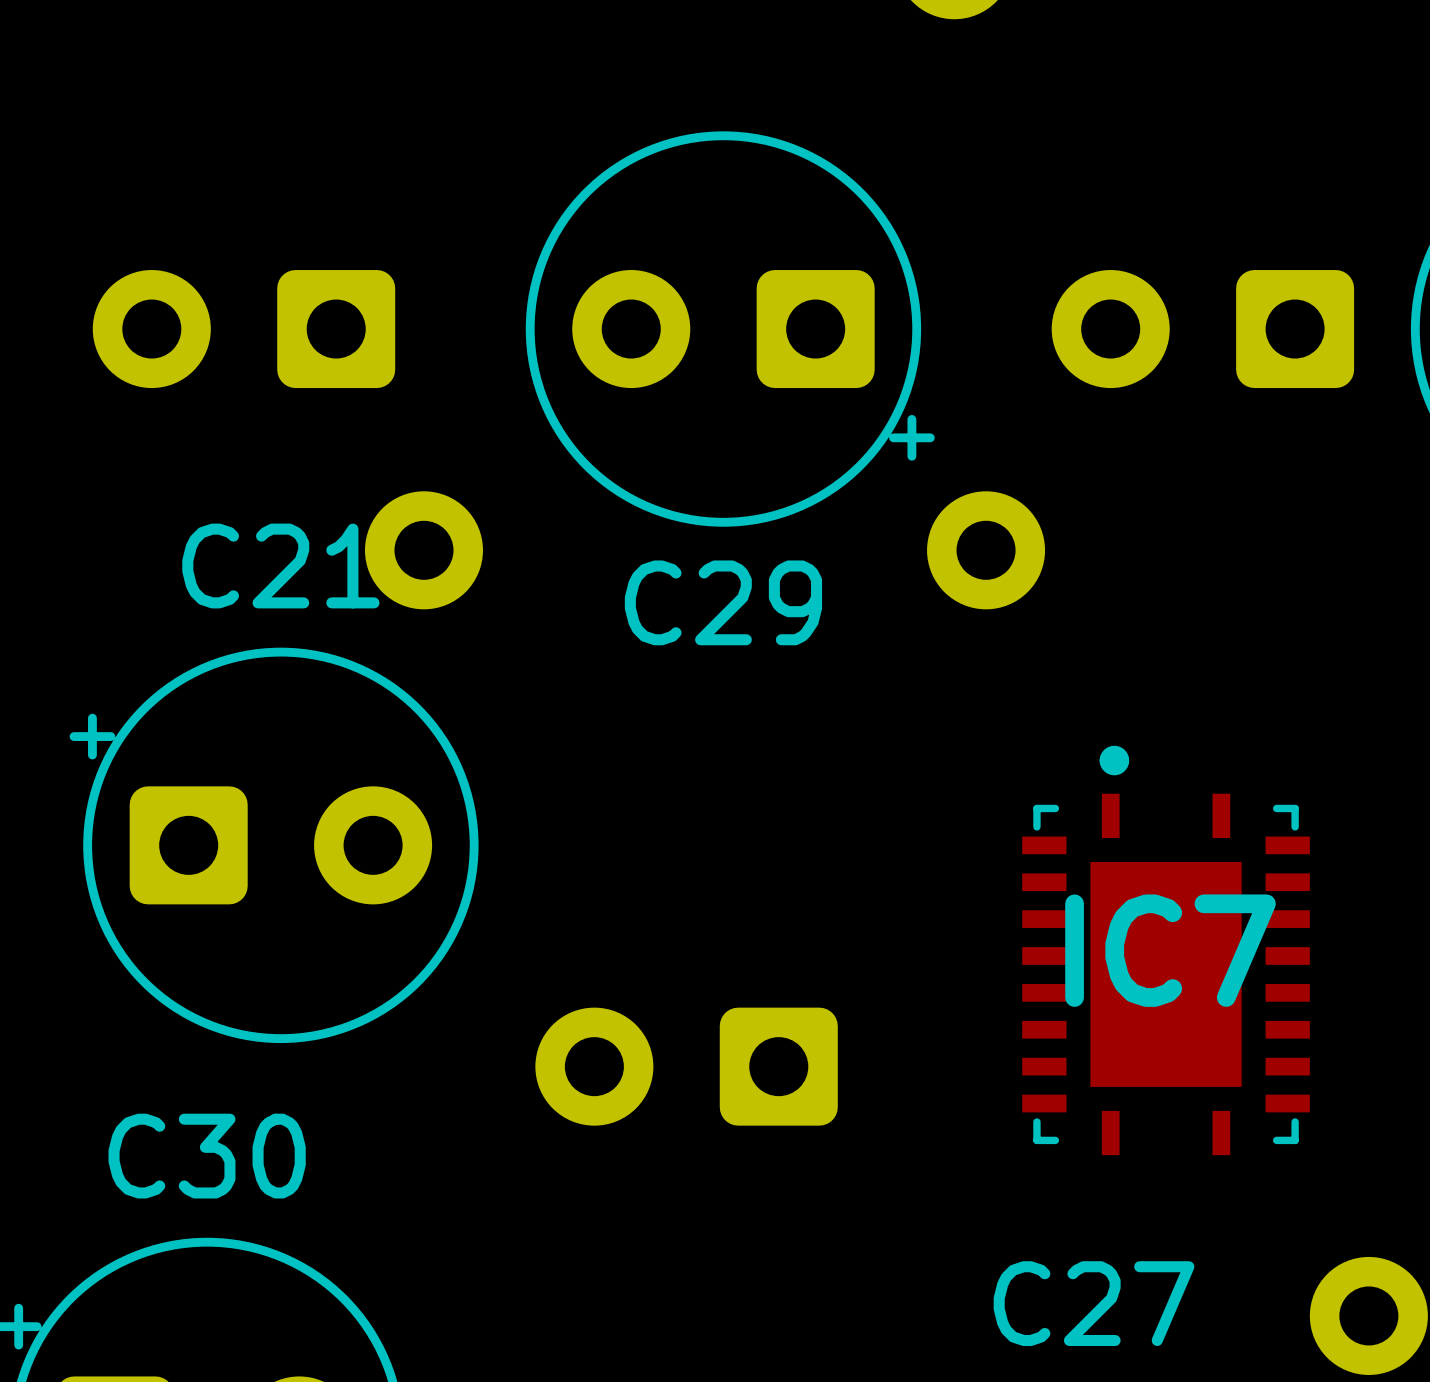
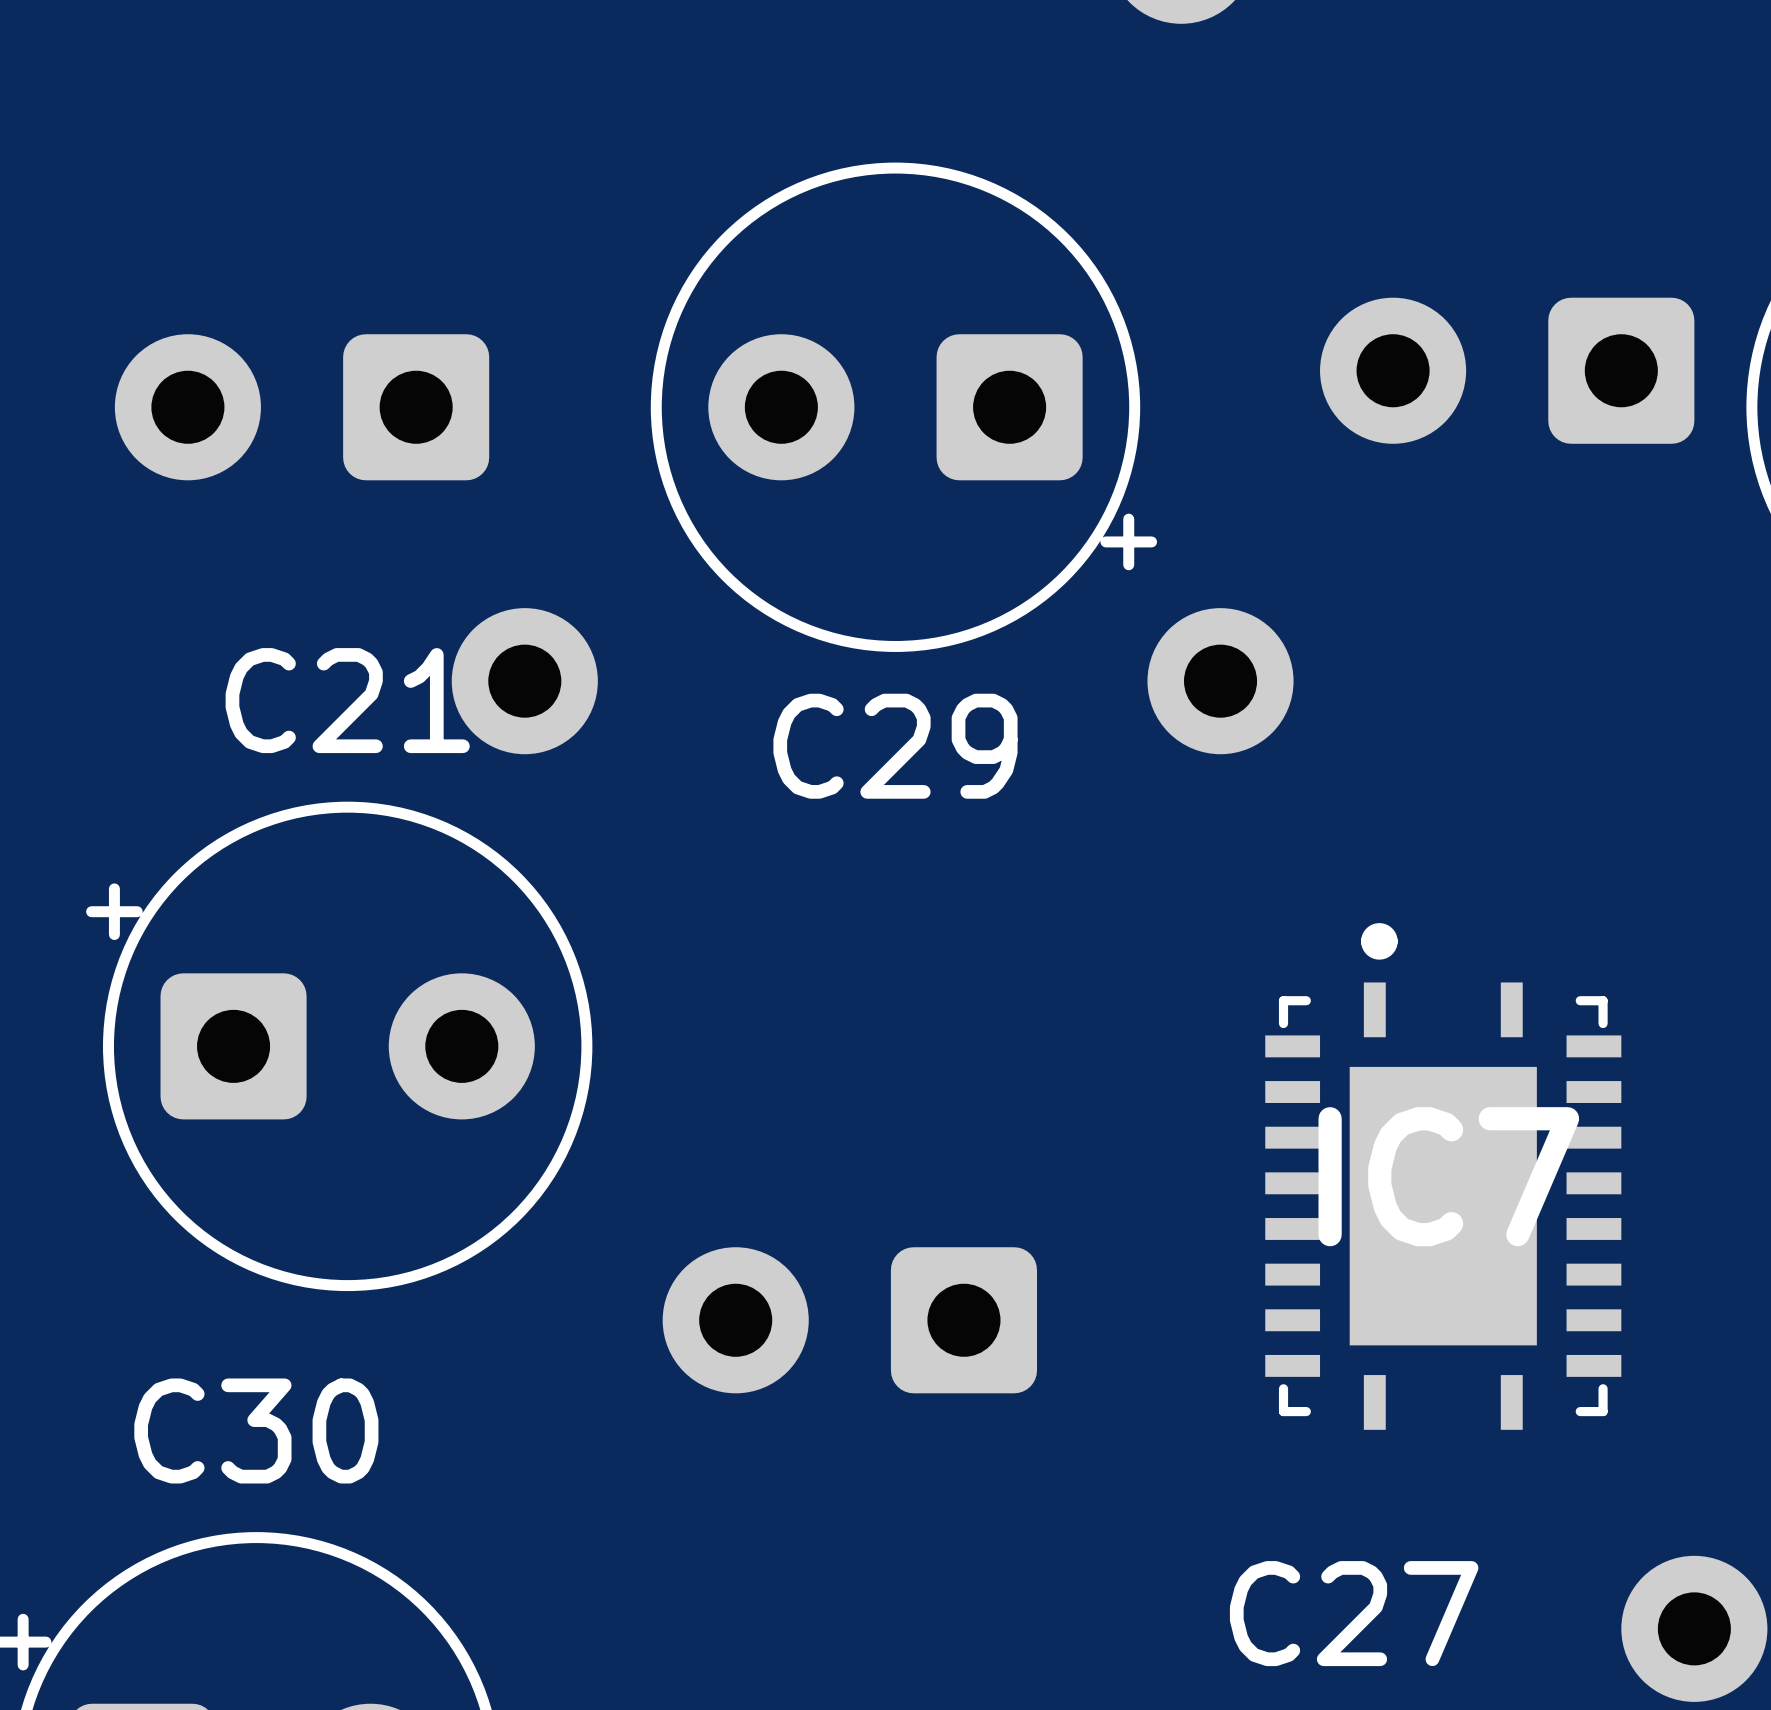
part position: (1202, 329) -> (1507, 370)

